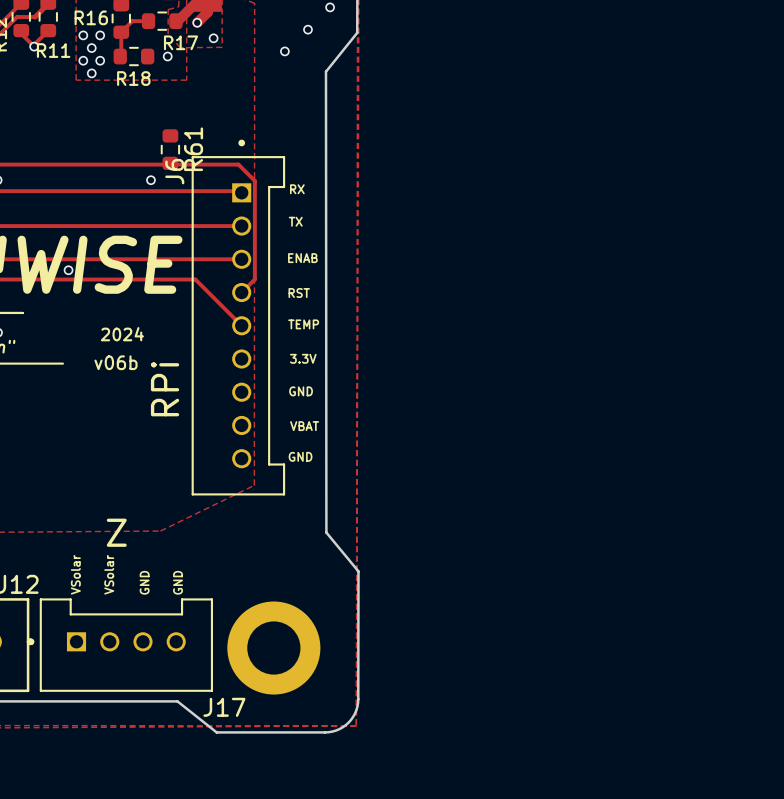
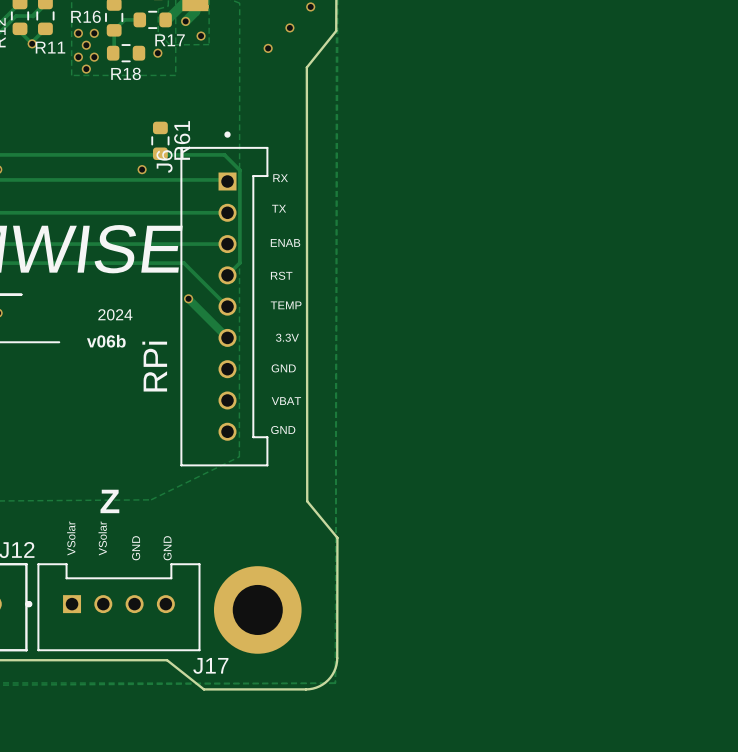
via: (68, 270) -> none
track: none -> (188, 298) (227, 337)
via: none -> (188, 298)

